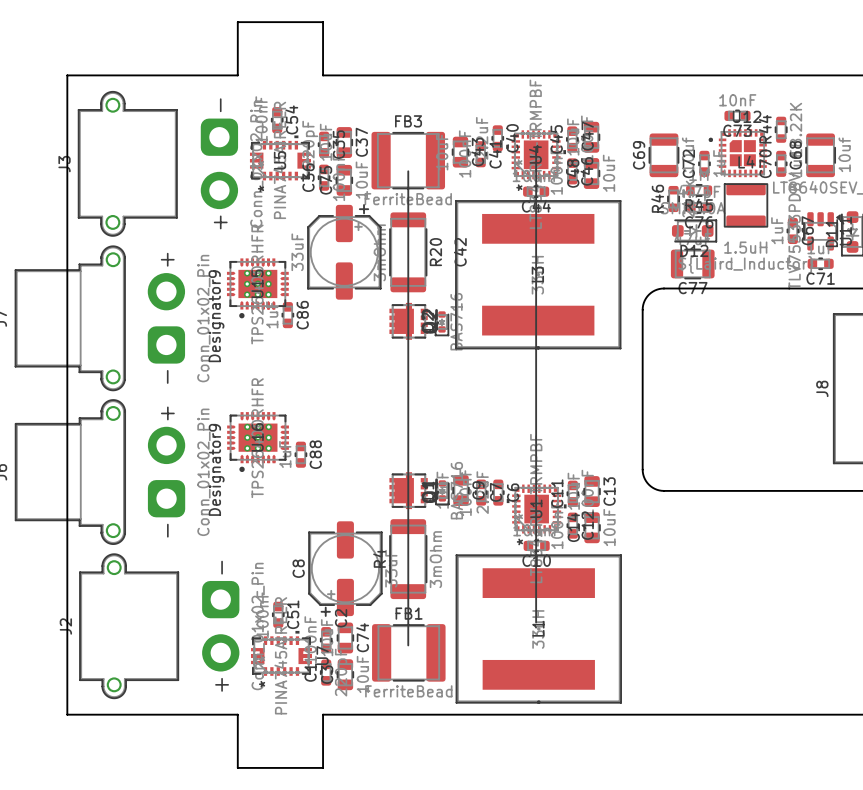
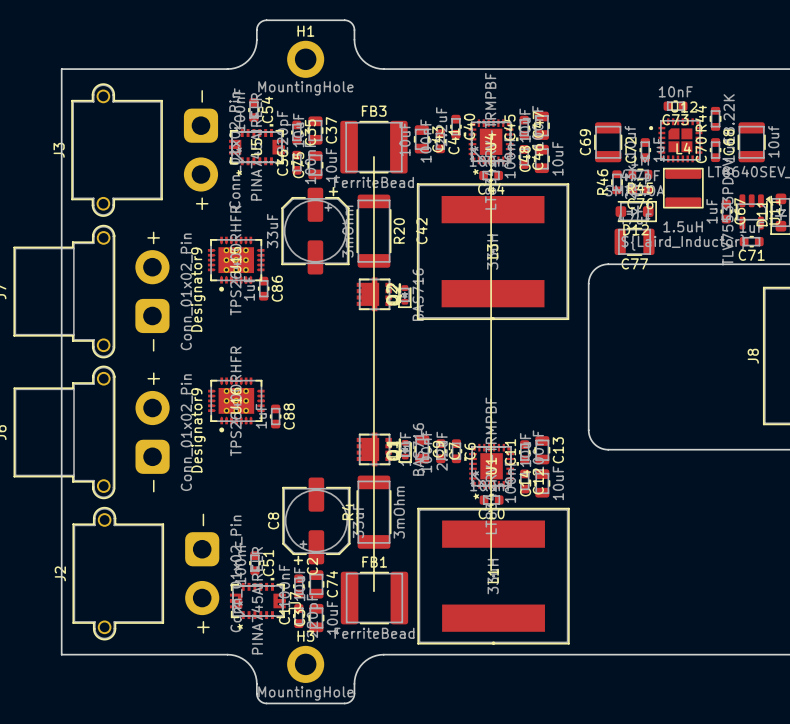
board edge: (291, 22) (237, 22) (237, 75) -> (266, 20) (257, 25) (255, 47) (248, 60) (235, 68) (217, 69)
board edge: (323, 22) (323, 75) (418, 75) -> (295, 20) (349, 21) (353, 26) (355, 47) (360, 57) (372, 66) (383, 69)
H1: none -> MountingHole (305, 59)
board edge: (237, 714) (237, 767) (291, 767) -> (217, 654) (235, 655) (248, 663) (255, 676) (257, 697) (266, 703)
board edge: (418, 714) (323, 714) (323, 767) -> (383, 654) (372, 656) (360, 666) (355, 676) (353, 696) (349, 701) (295, 703)
H3: none -> MountingHole (305, 664)

